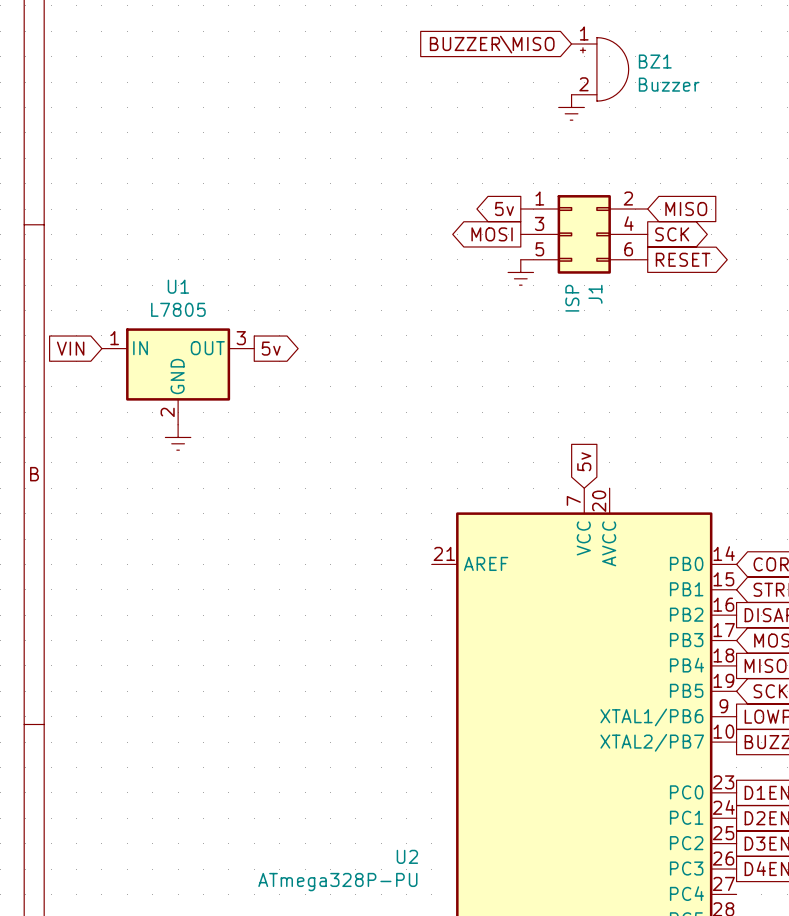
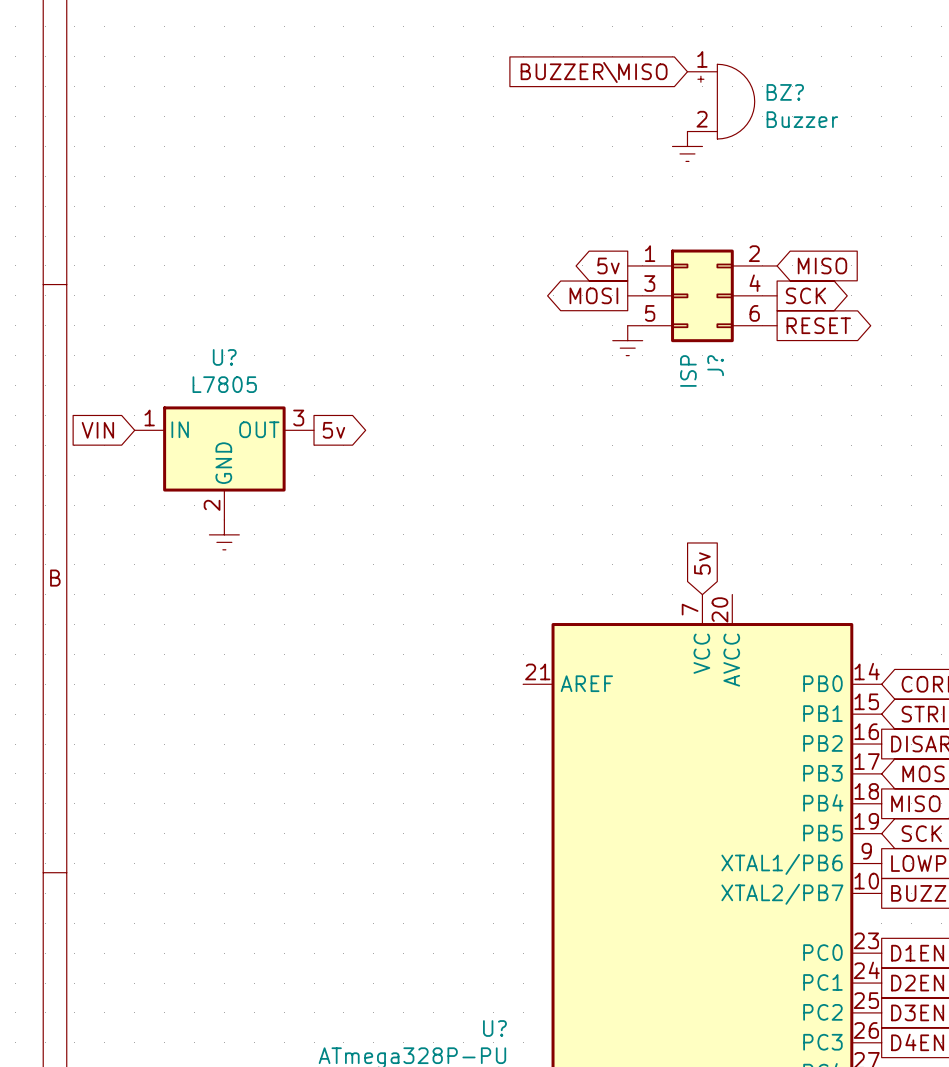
BZ1 name: BZ1 (655, 61) -> BZ? (785, 92)
U1 name: U1 (178, 286) -> U? (224, 357)
J1 name: J1 (595, 294) -> J? (715, 365)
U2 name: U2 (407, 856) -> U? (494, 1028)

